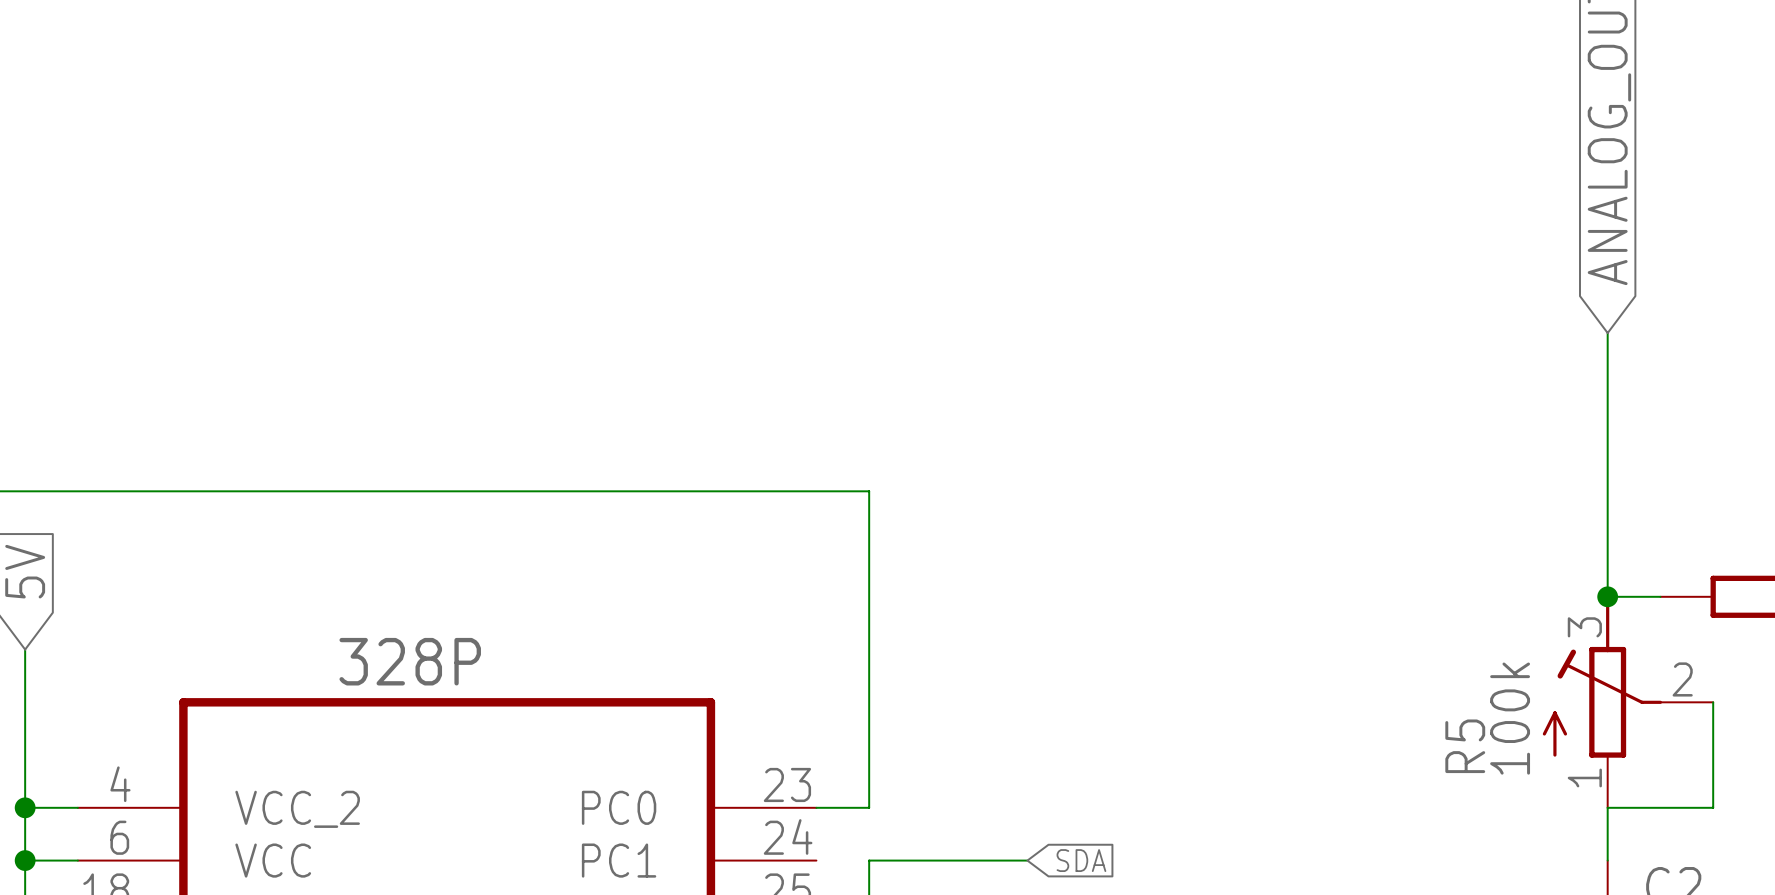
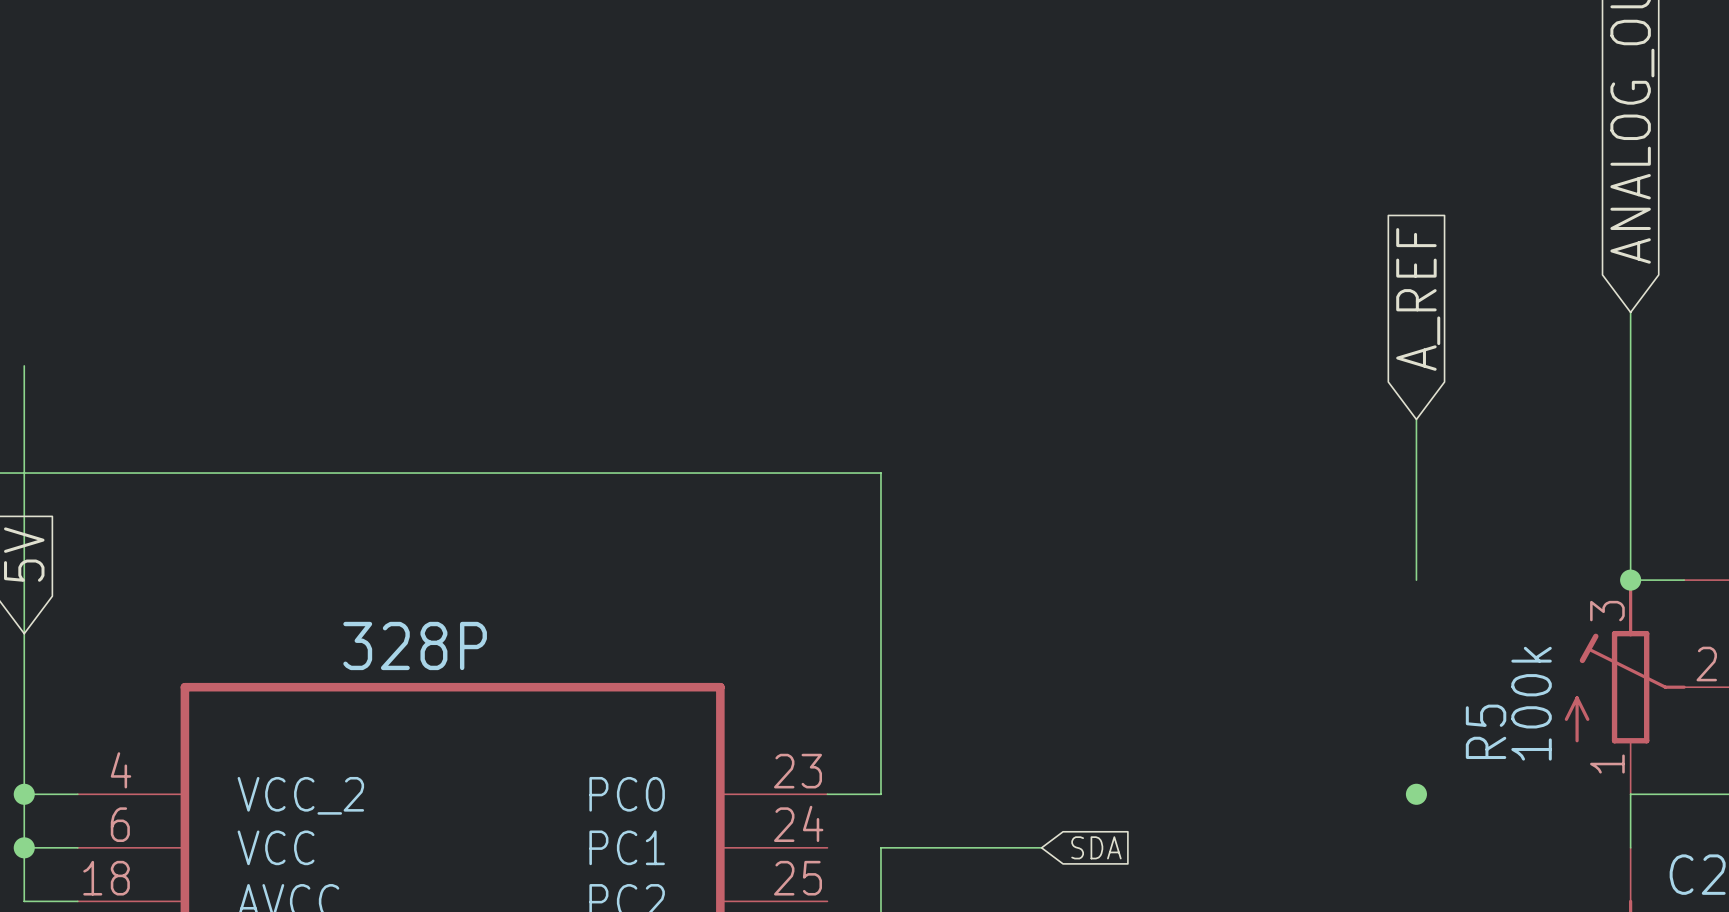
global label: none -> A_REF (1418, 299)
wire: none -> (24, 365) (24, 633)
wire: none -> (1416, 419) (1416, 580)
junction: none -> (1416, 794)

